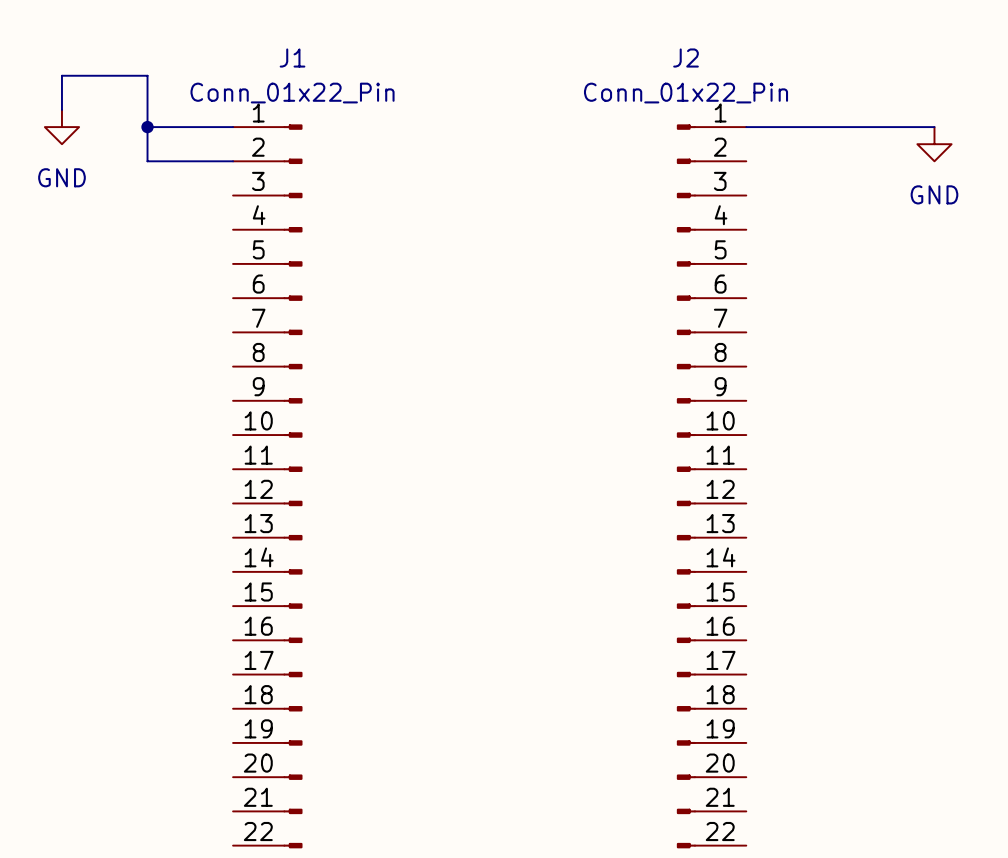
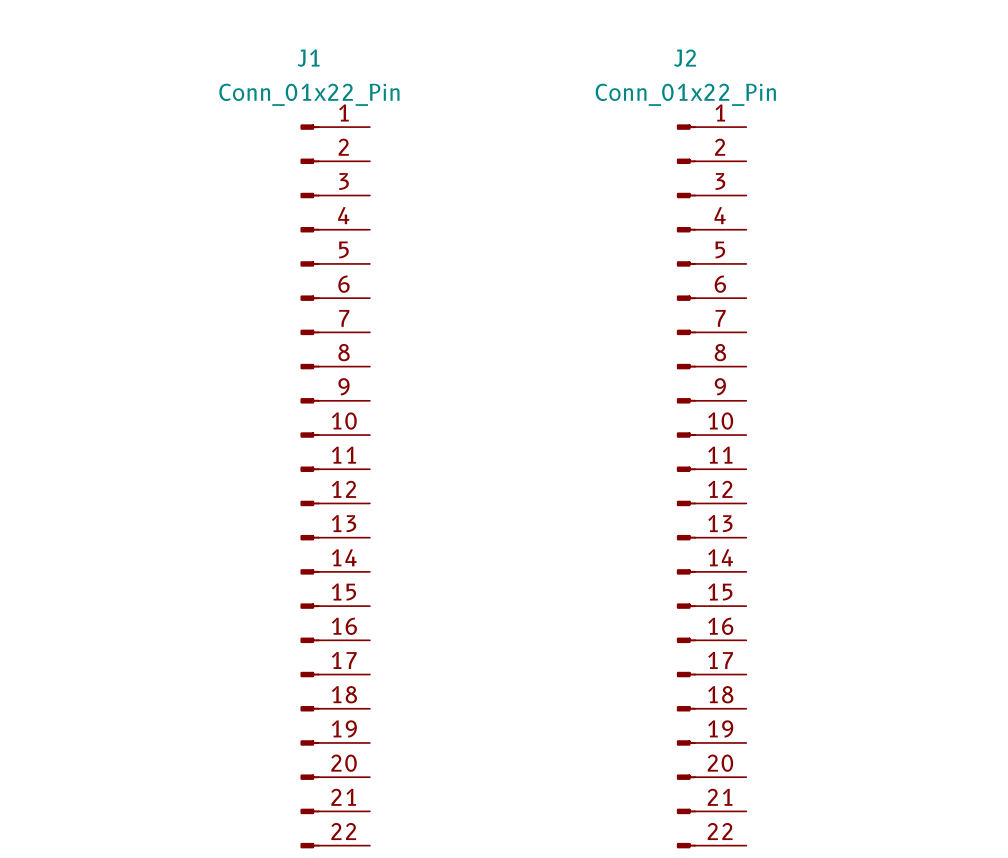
wire: (61, 109) (61, 75) (147, 75) (147, 161) (233, 161) -> none
power symbol: GND (61, 127) -> none
wire: (147, 127) (233, 127) -> none
junction: (147, 127) -> none
wire: (746, 127) (934, 127) -> none
power symbol: GND (934, 144) -> none
J1 flip: as is (292, 486) -> left-right (310, 486)

